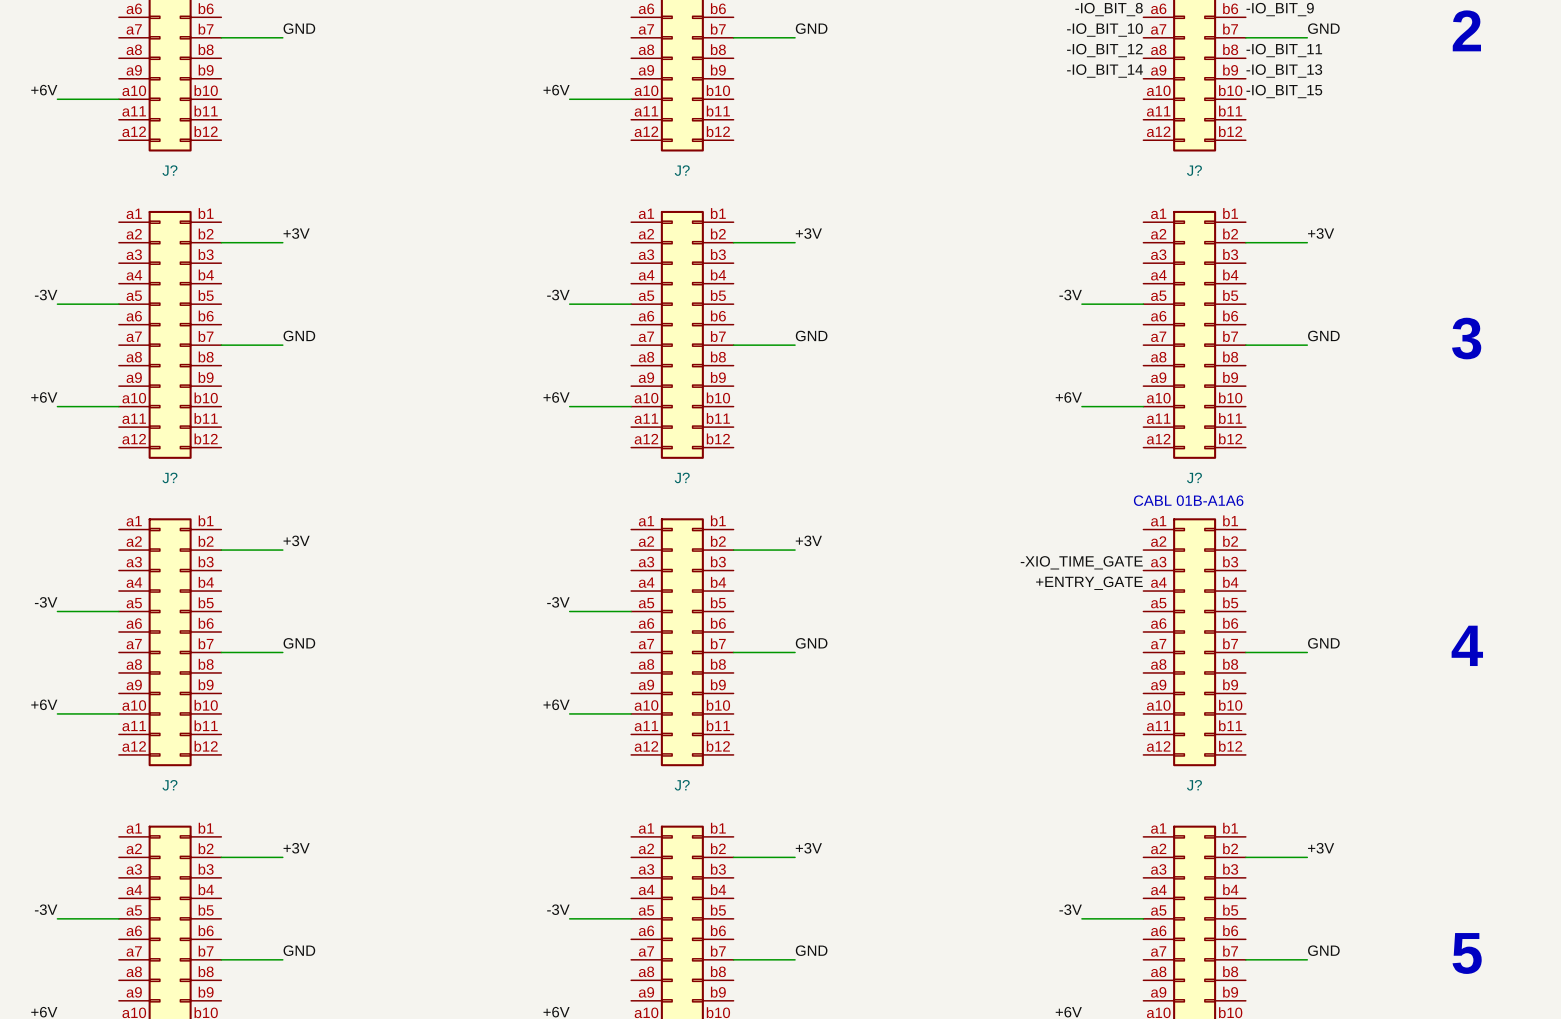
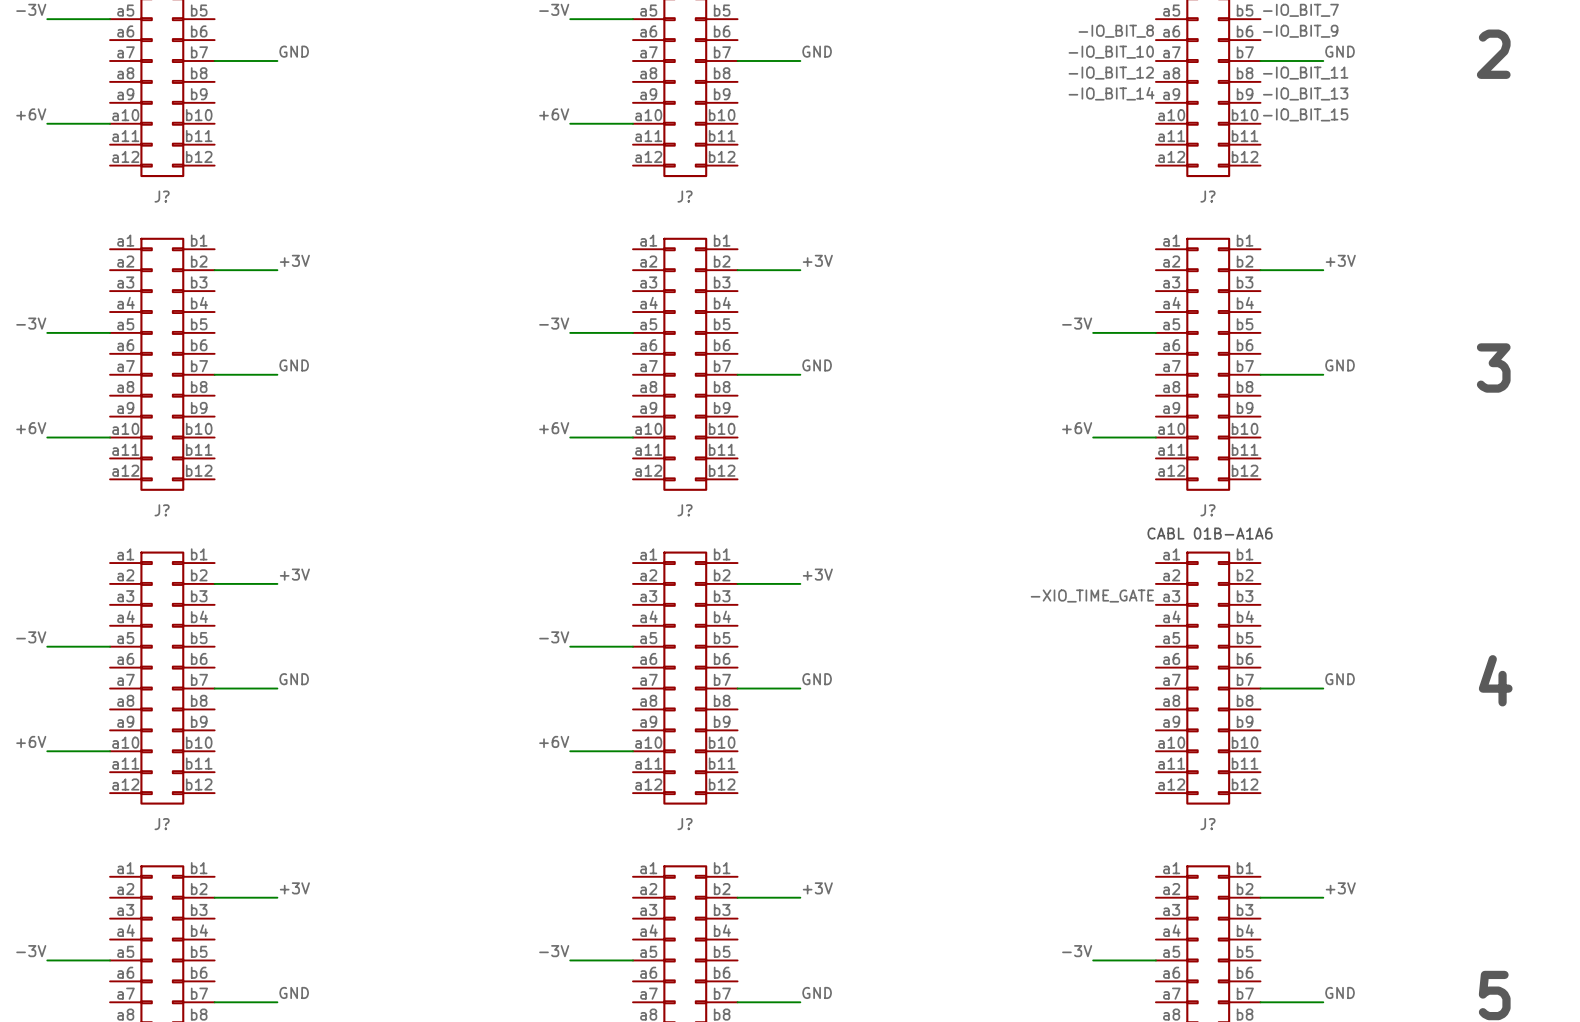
label: +ENTRY_GATE (1089, 583) -> none

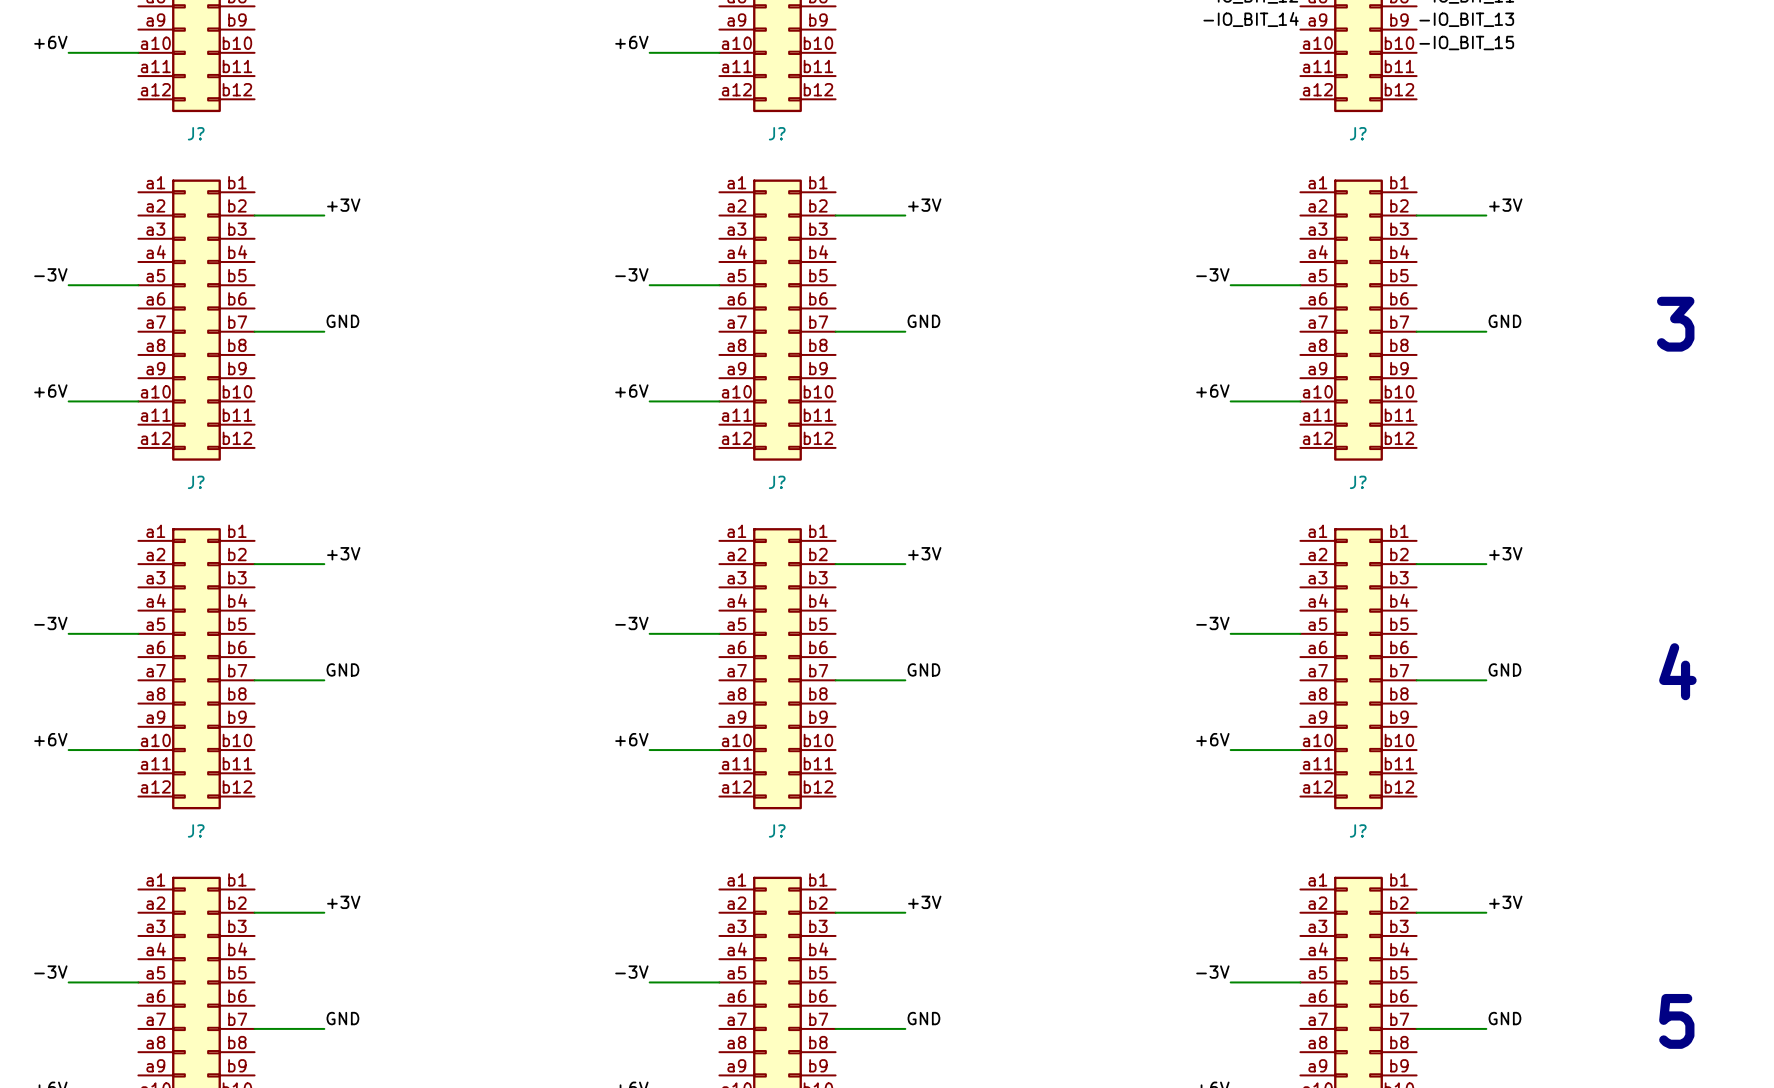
text: CABL 01B-A1A6 (1210, 533) -> none
label: none -> +3V (1505, 553)
wire: none -> (1416, 564) (1486, 564)
label: -XIO_TIME_GATE (1092, 596) -> none
label: none -> -3V (1212, 623)
wire: none -> (1230, 633) (1300, 633)
label: none -> +6V (1212, 739)
wire: none -> (1230, 750) (1300, 750)

